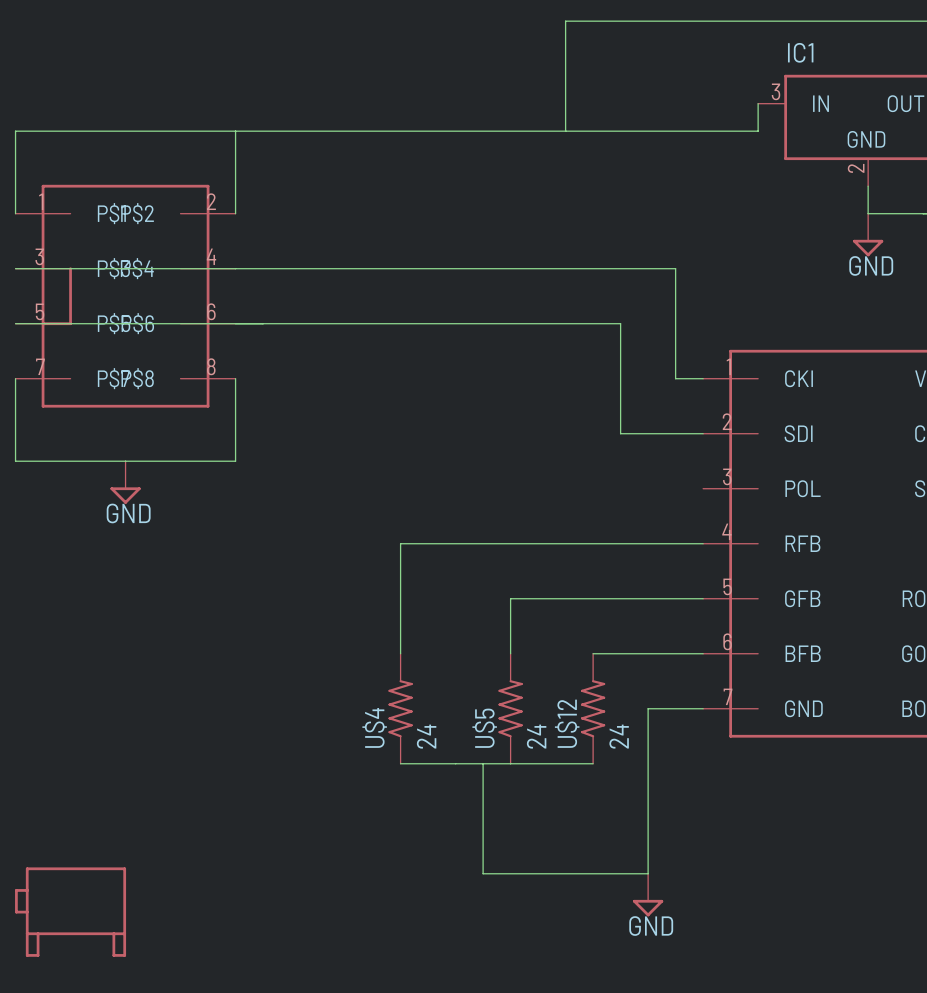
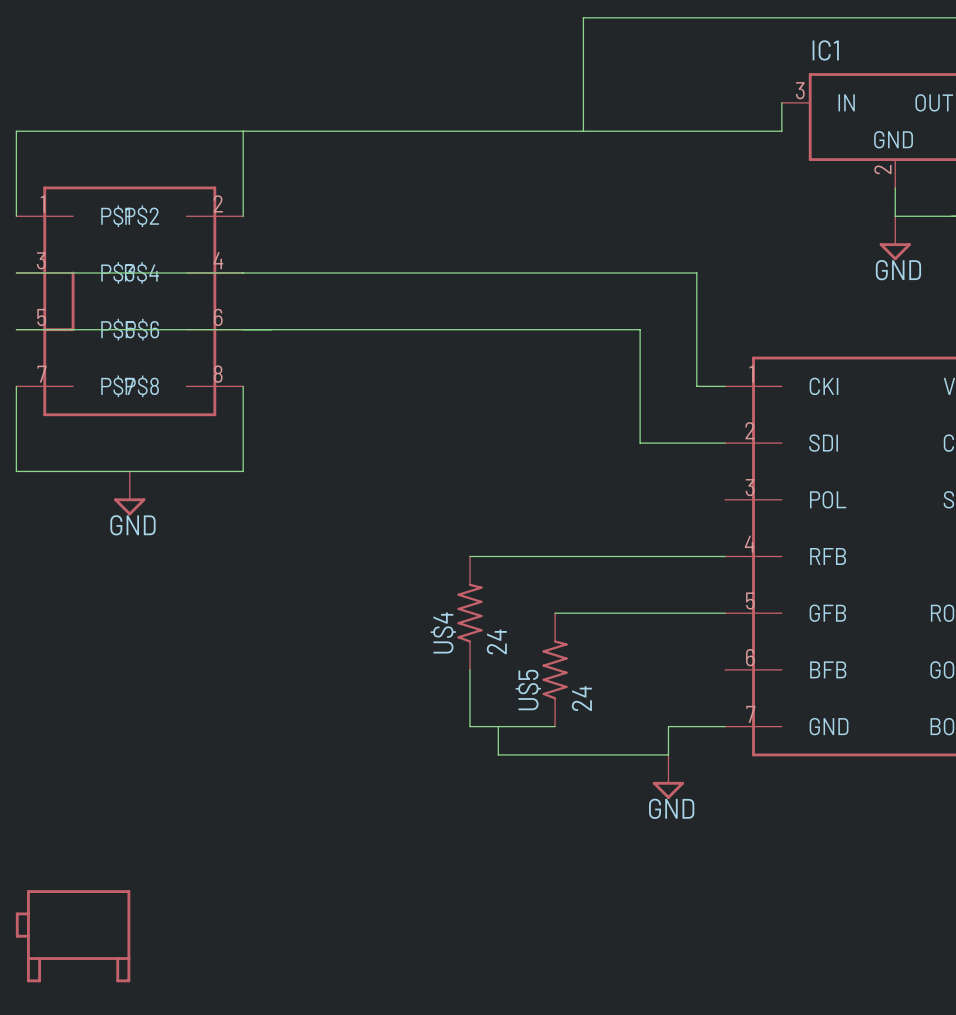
wire: (455, 543) (400, 543) (400, 653) -> none
wire: (538, 598) (510, 598) (510, 653) -> none
wire: none -> (470, 669) (470, 726) (555, 726)
wire: (593, 653) (703, 653) -> none
U$4 position: (400, 708) -> (470, 613)
U$5 position: (510, 708) -> (555, 669)
U$12: 24 (593, 708) -> none
wire: (648, 736) (648, 873) (483, 873) (483, 763) -> (668, 754) (498, 754) (498, 726)
wire: (400, 763) (593, 763) -> none
power symbol position: GND (648, 895) -> GND (668, 776)

